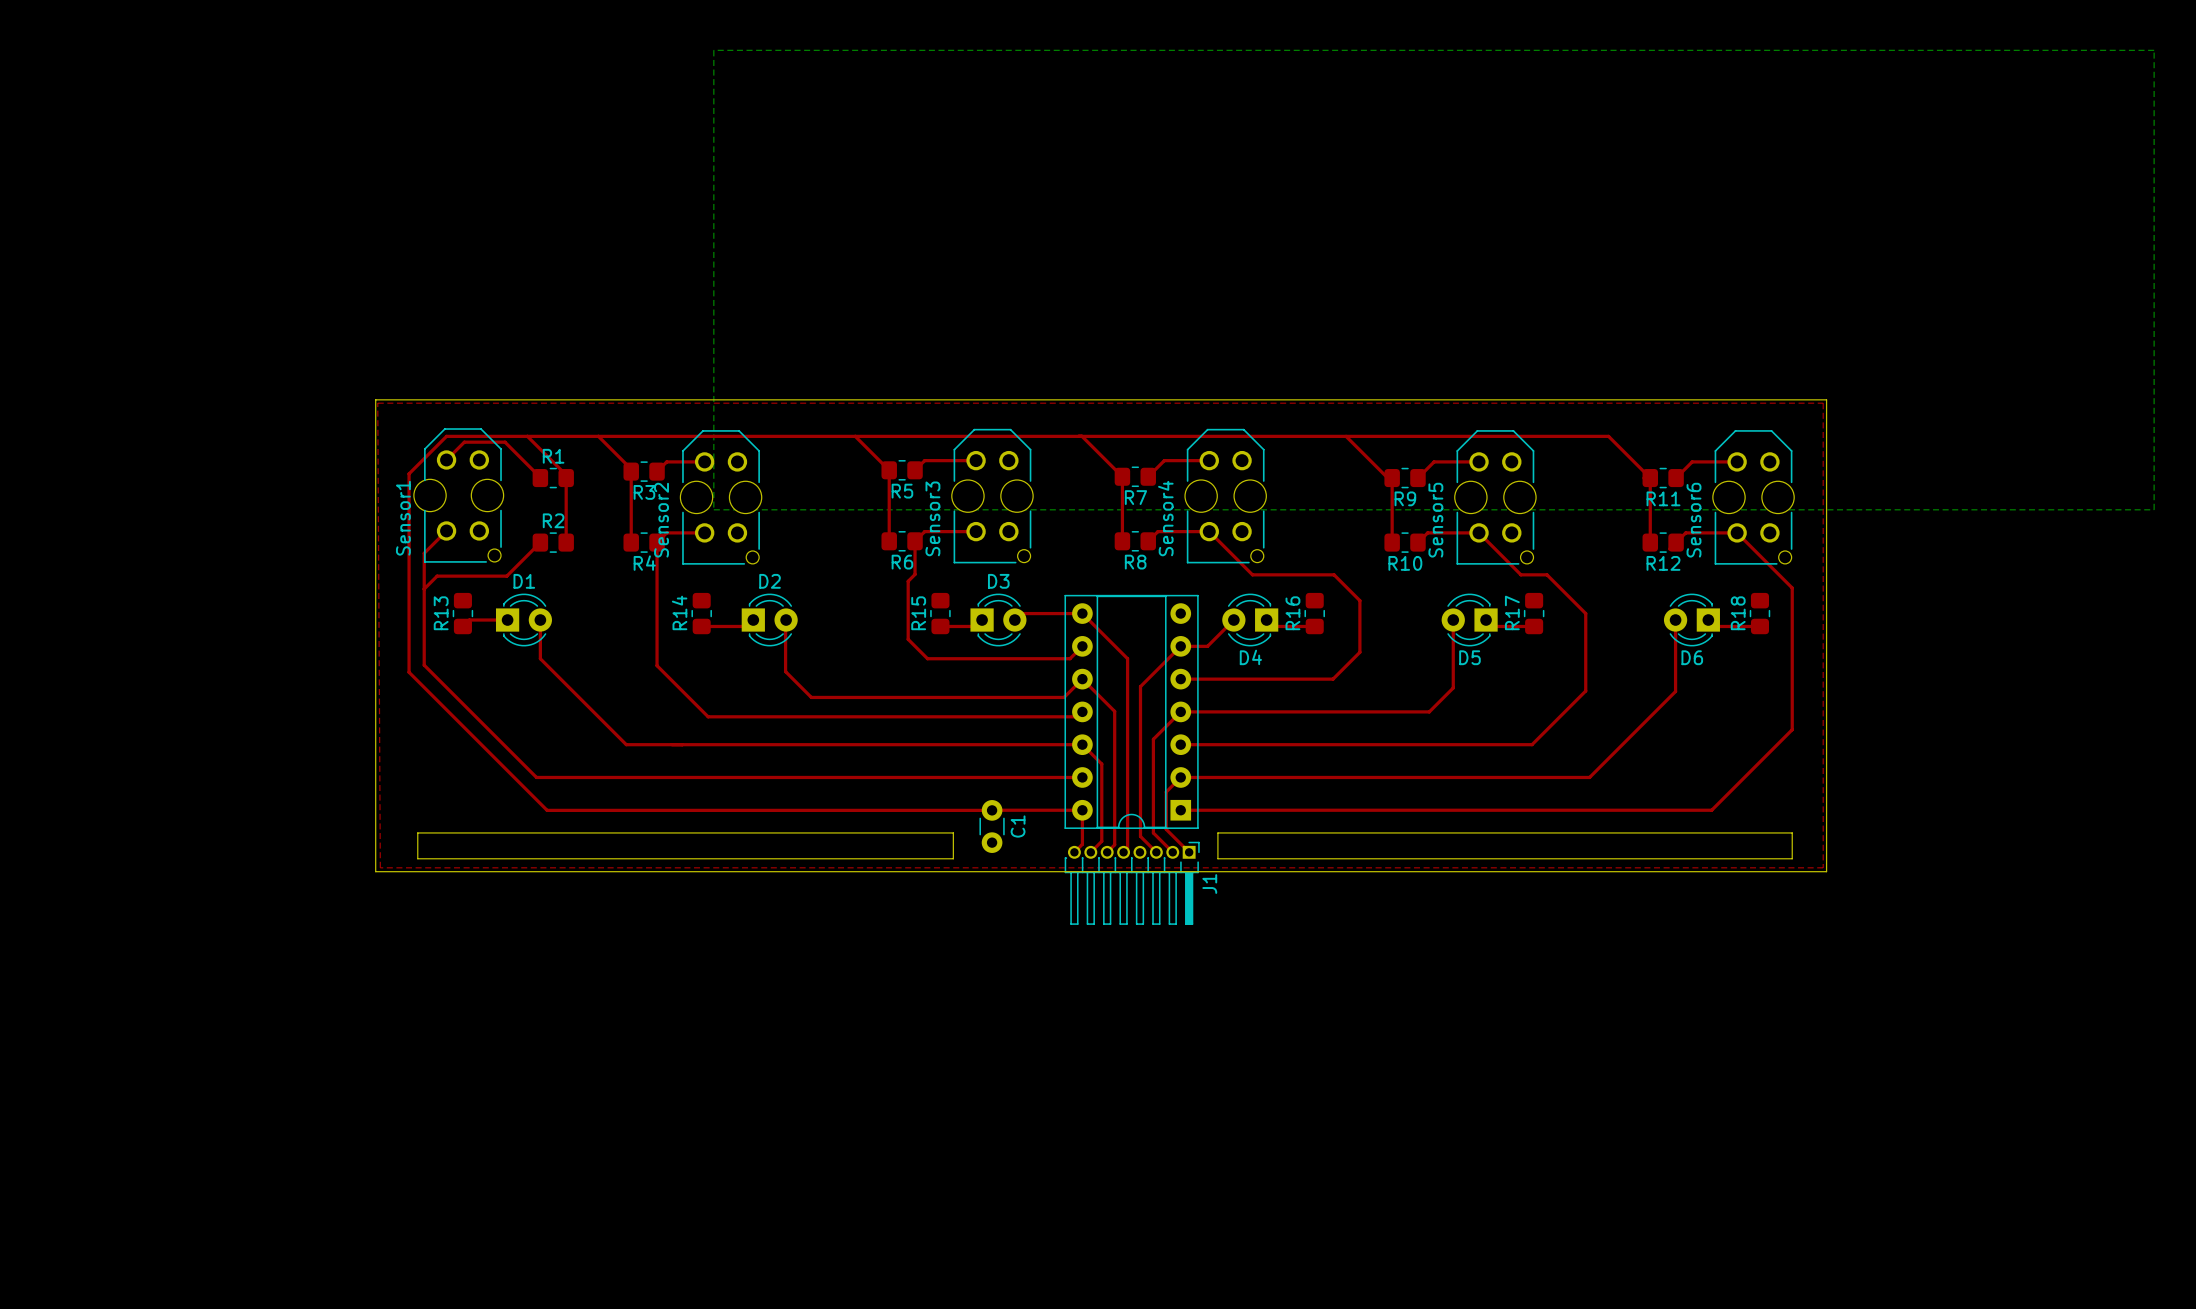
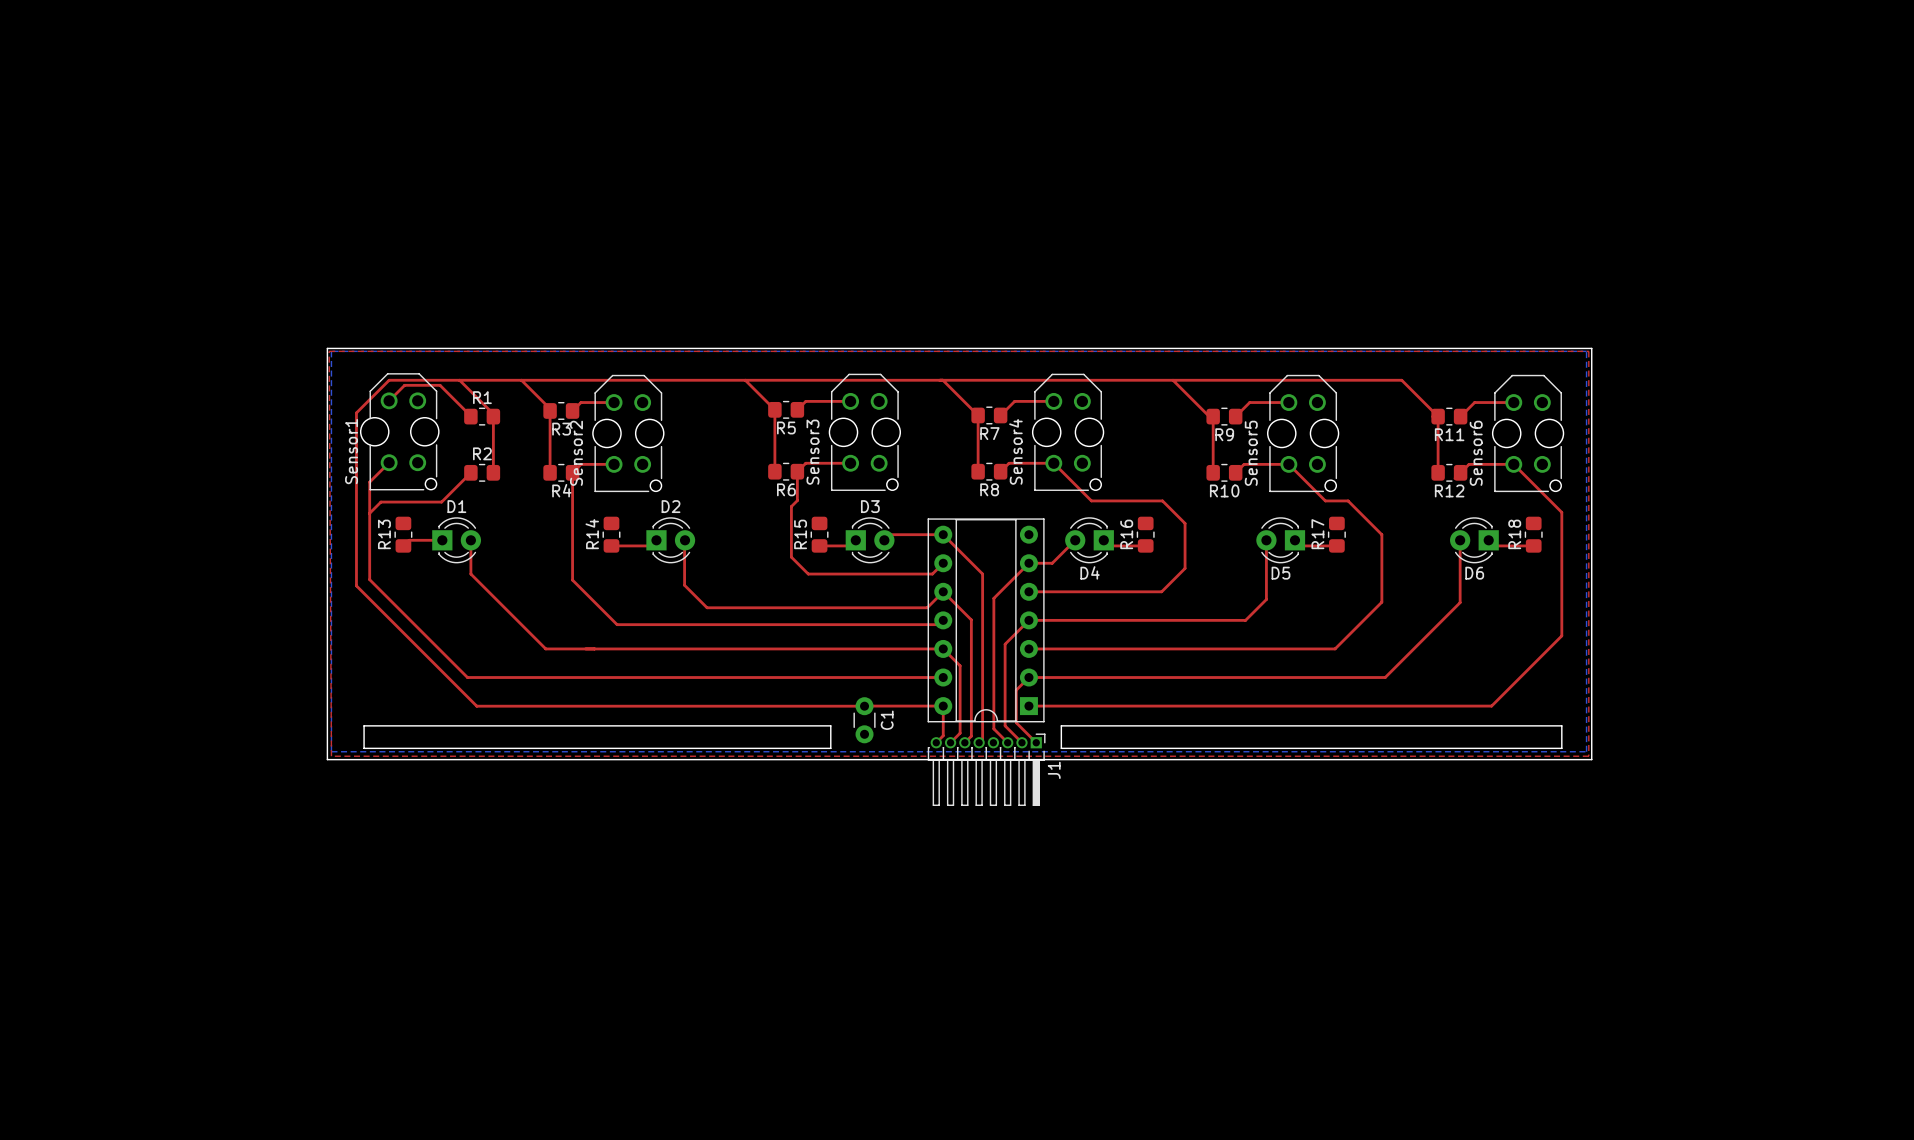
bottom zone outline: (713, 50) (2154, 50) (2154, 509) (713, 509) (713, 50) -> none
bottom zone outline: none -> (331, 351) (1586, 351) (1586, 751) (331, 751) (331, 351)

